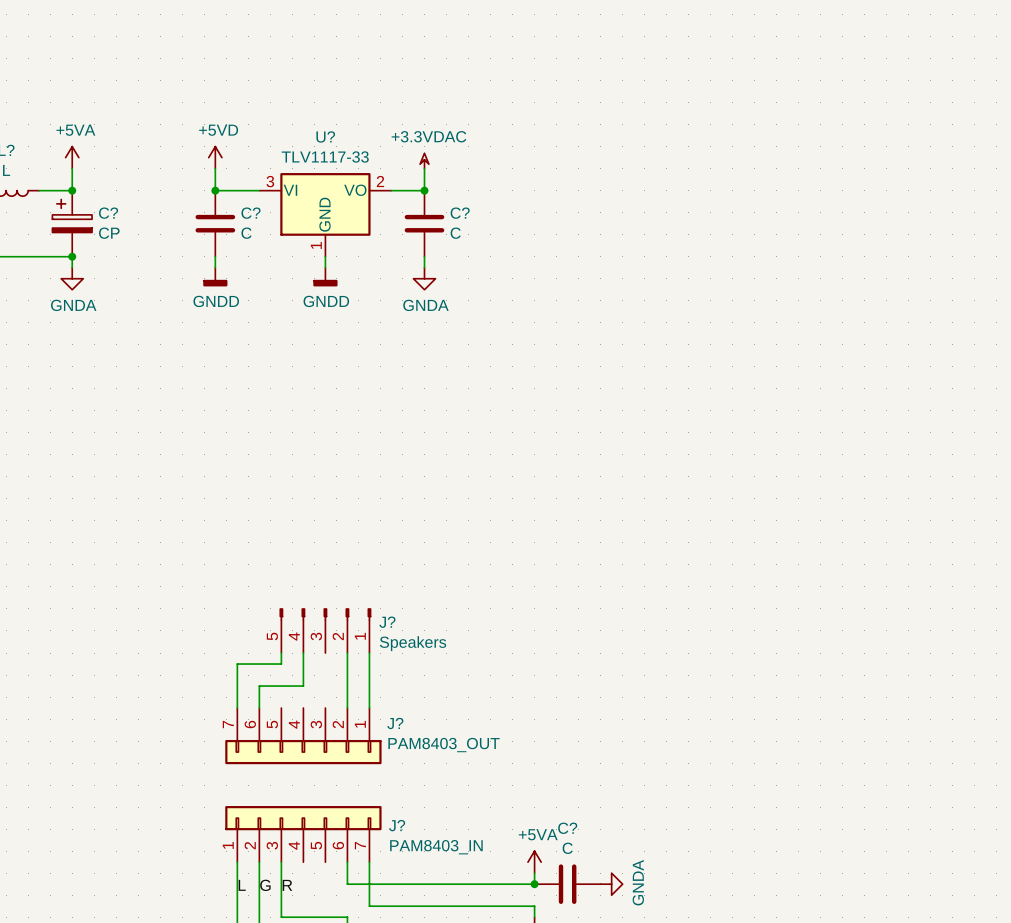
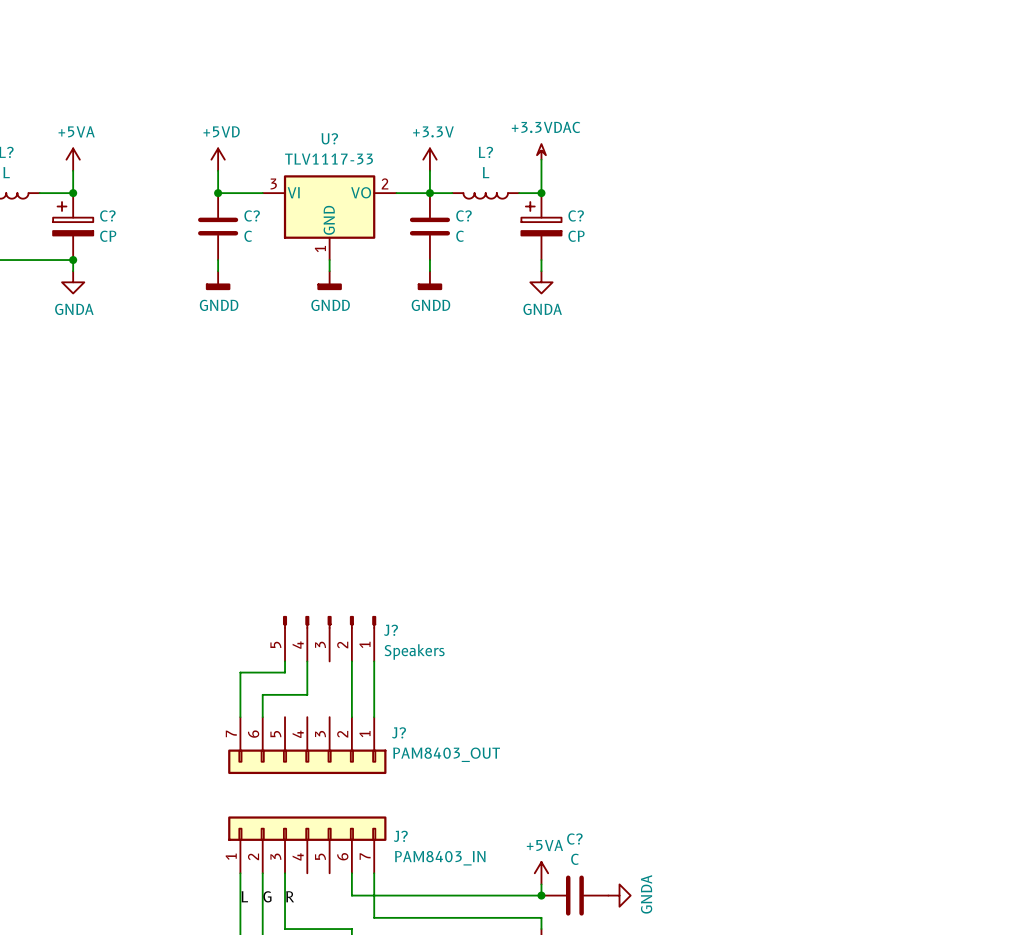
power symbol: none -> +3.3VDAC (541, 151)
wire: none -> (541, 159) (541, 193) (519, 193)
power symbol: +3.3VDAC (424, 160) -> +3.3V (429, 159)
wire: none -> (429, 193) (452, 193)
junction: none -> (541, 193)
L?: none -> L (485, 195)
C?: none -> CP (541, 226)
wire: none -> (541, 260) (541, 271)
power symbol: GNDA (424, 278) -> GNDD (429, 280)
power symbol: none -> GNDA (541, 282)

